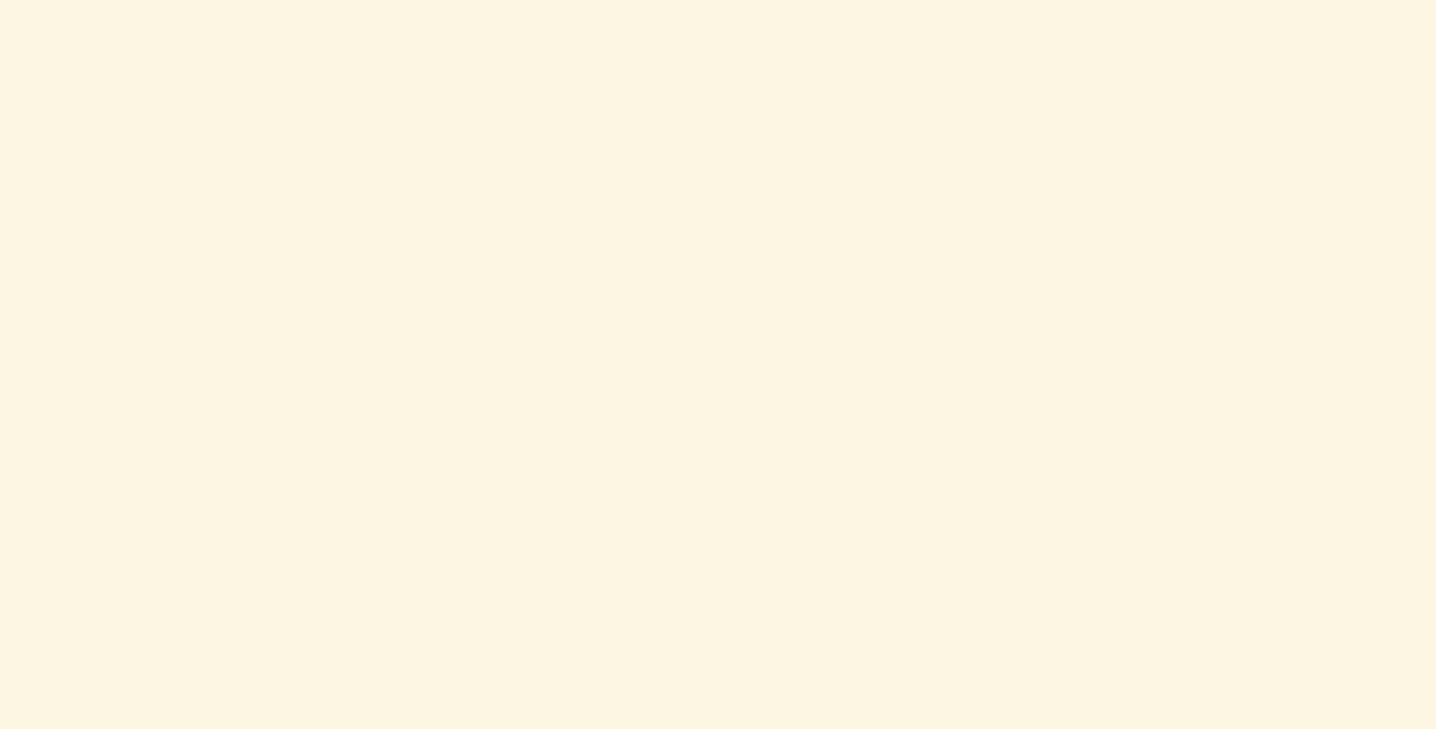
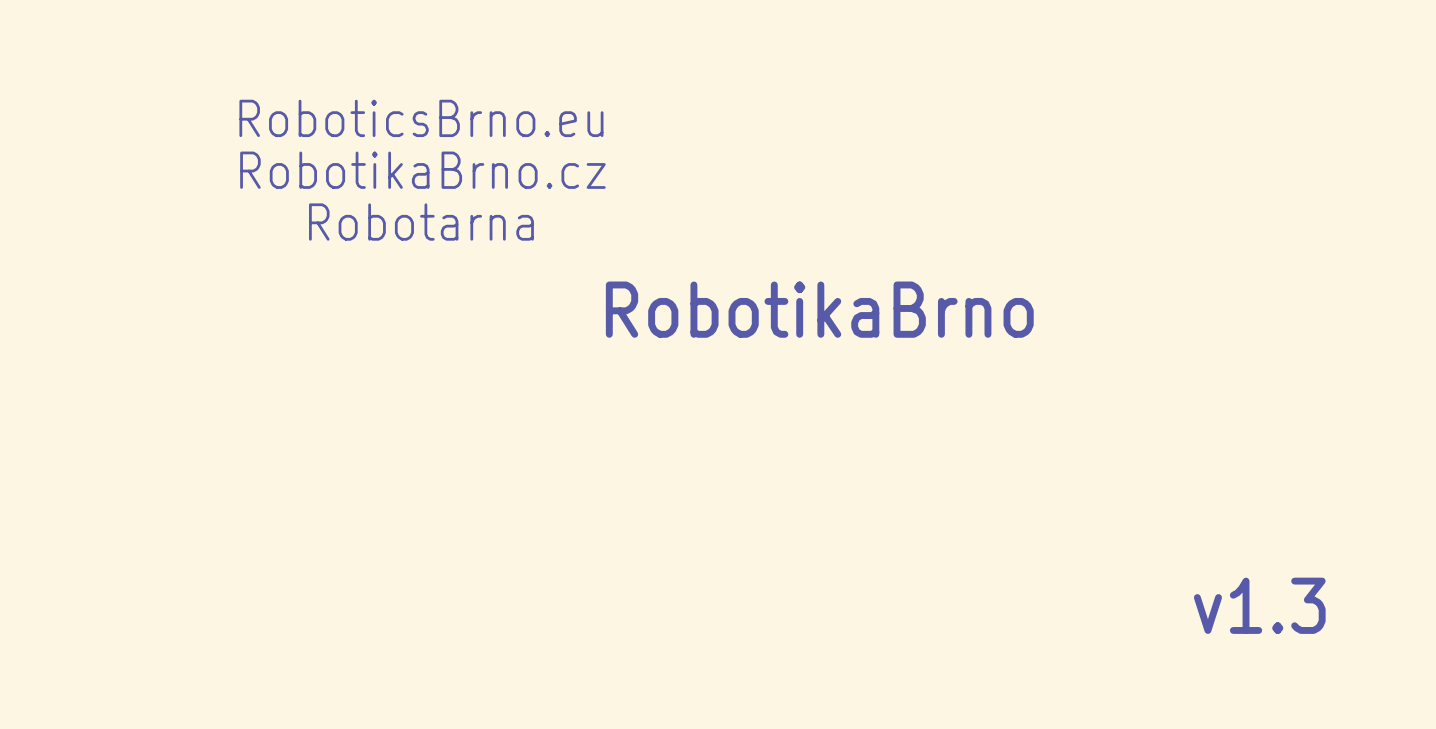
text: none -> RoboticsBrno.eu (421, 118)
text: none -> RobotikaBrno.cz (422, 170)
text: none -> Robotarna (421, 222)
text: none -> RobotikaBrno (819, 309)
text: none -> v1.3 (1259, 605)

